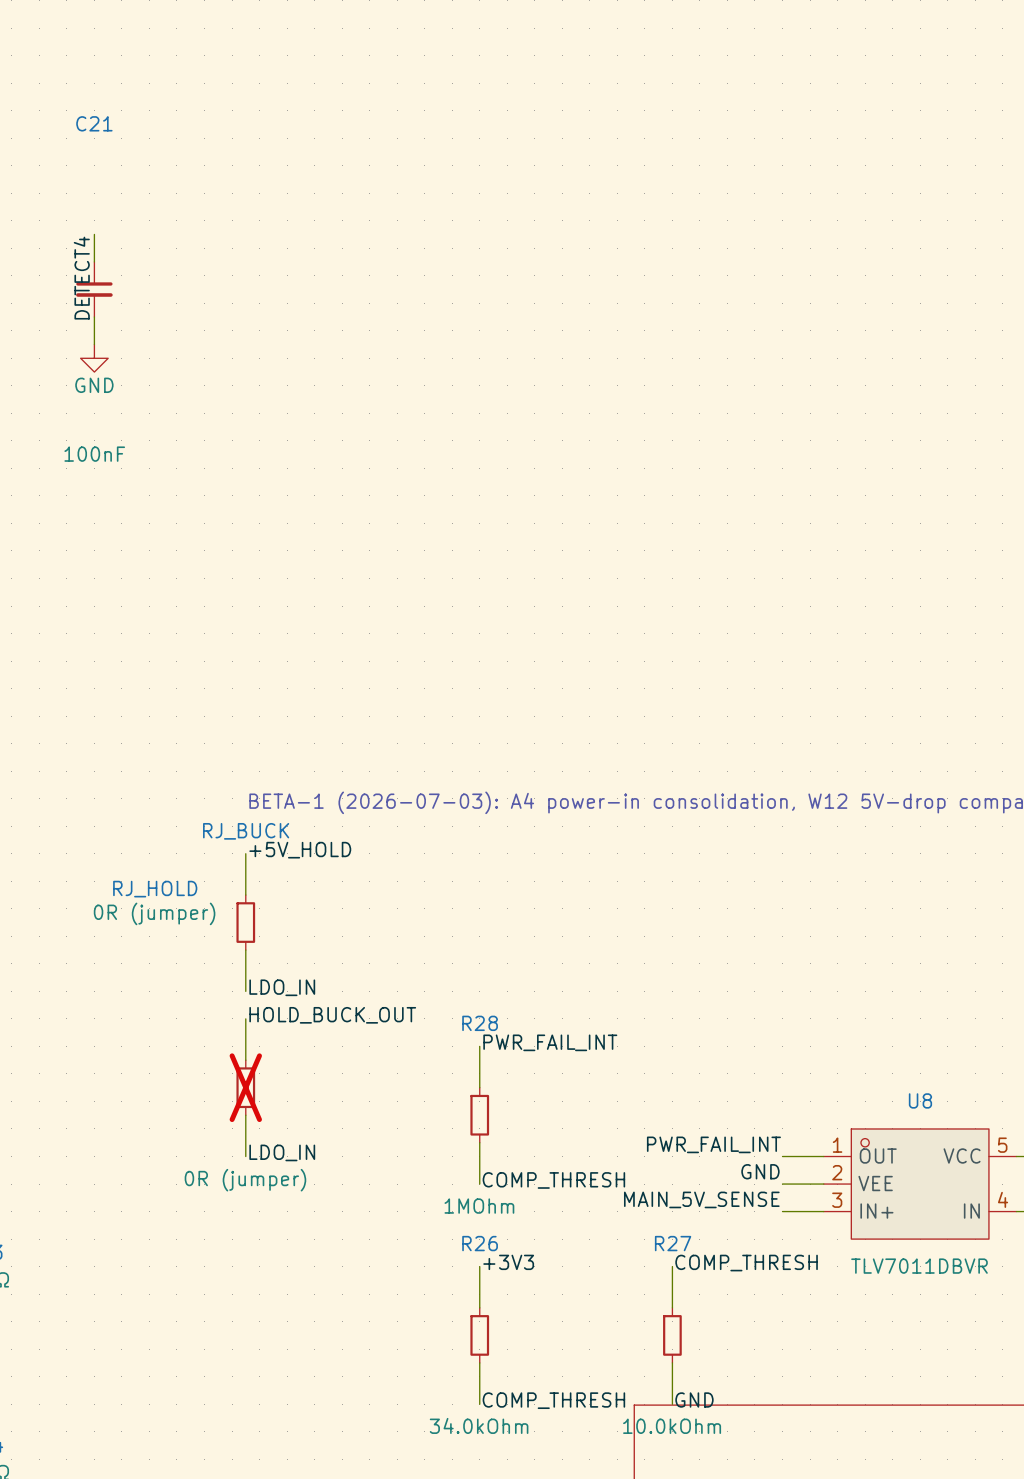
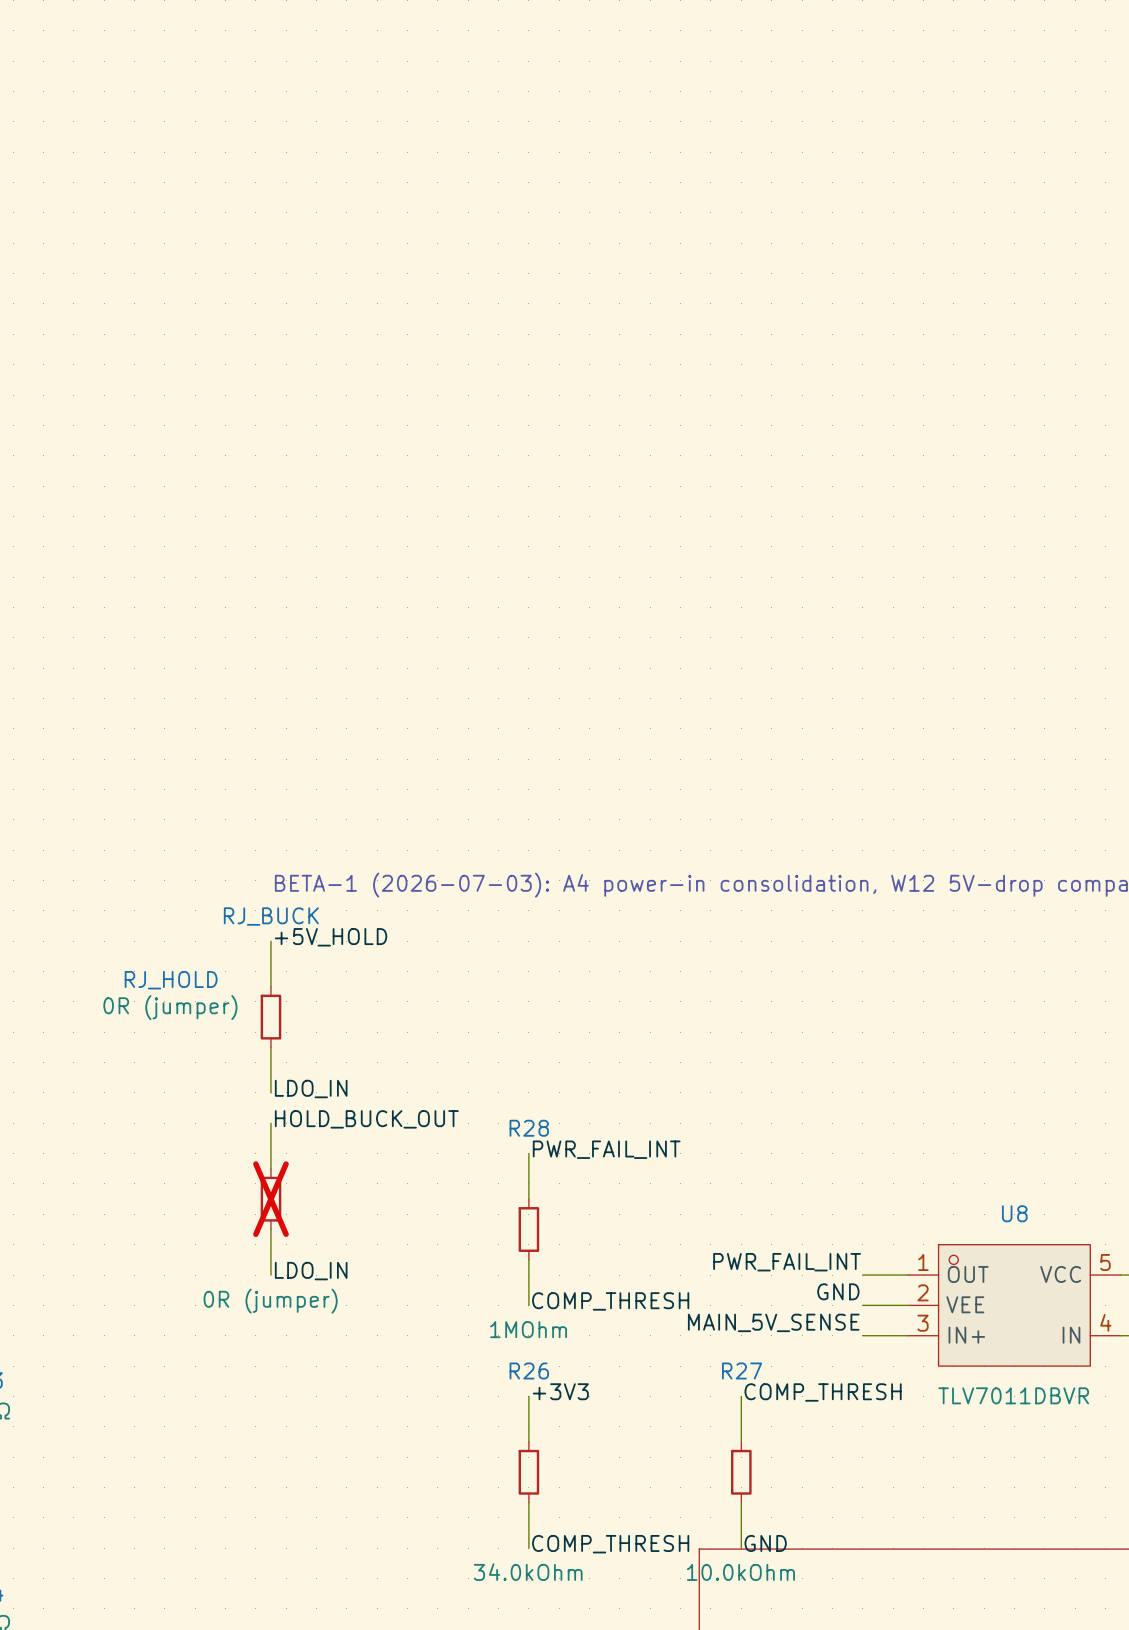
wire: (94, 234) (94, 261) -> none
label: DETECT4 (81, 278) -> none
C21: 100nF (94, 289) -> none
wire: (94, 317) (94, 344) -> none
power symbol: GND (94, 358) -> none

